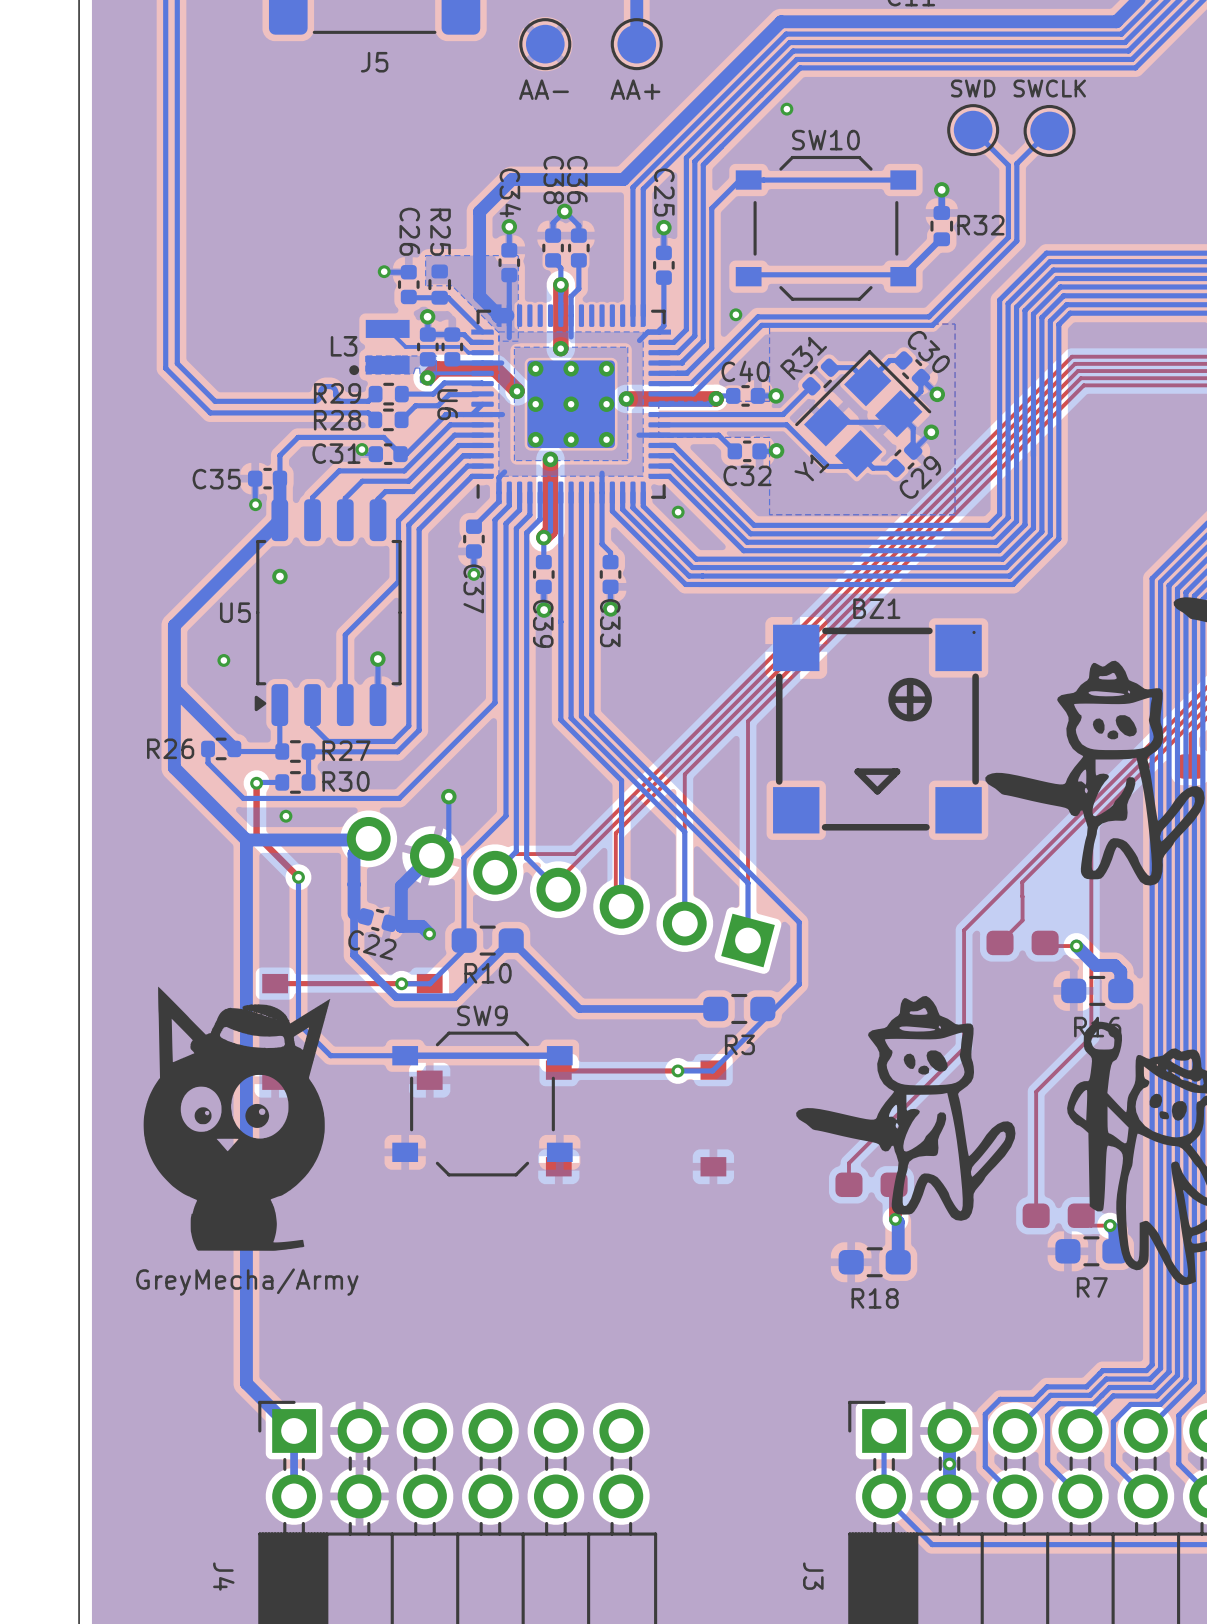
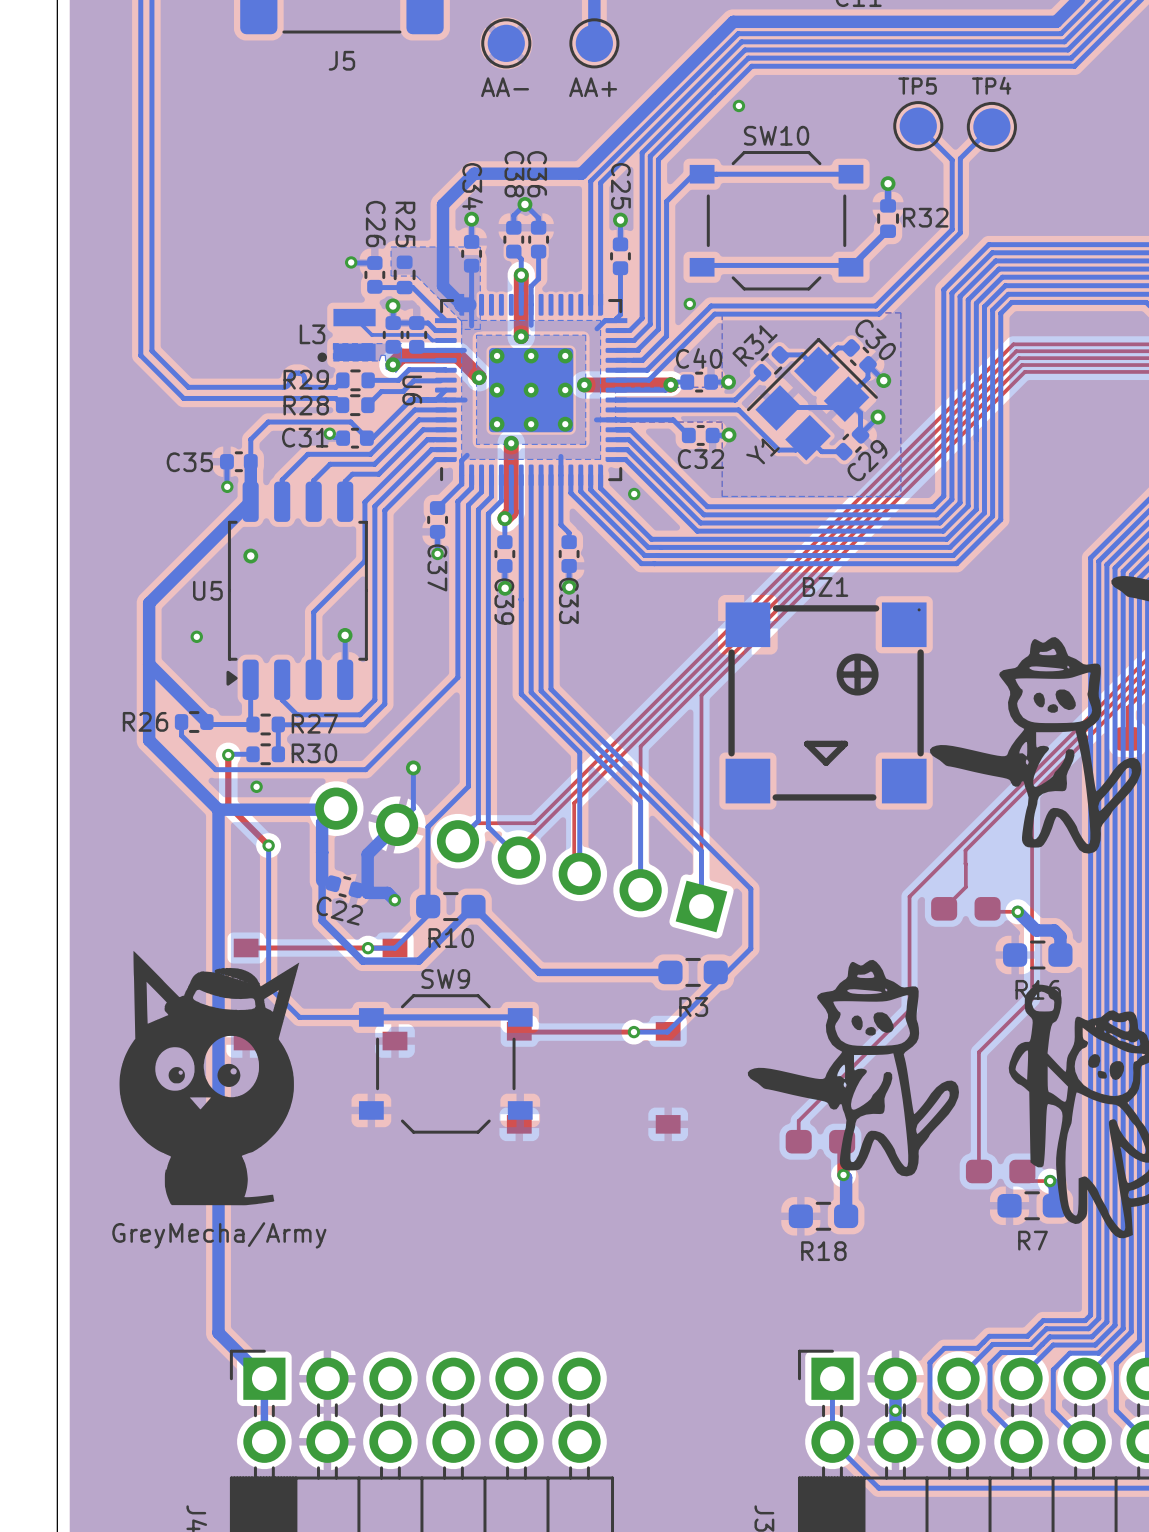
SWD name: SWD (973, 88) -> TP5 (917, 86)
SWCLK name: SWCLK (1049, 88) -> TP4 (991, 85)

